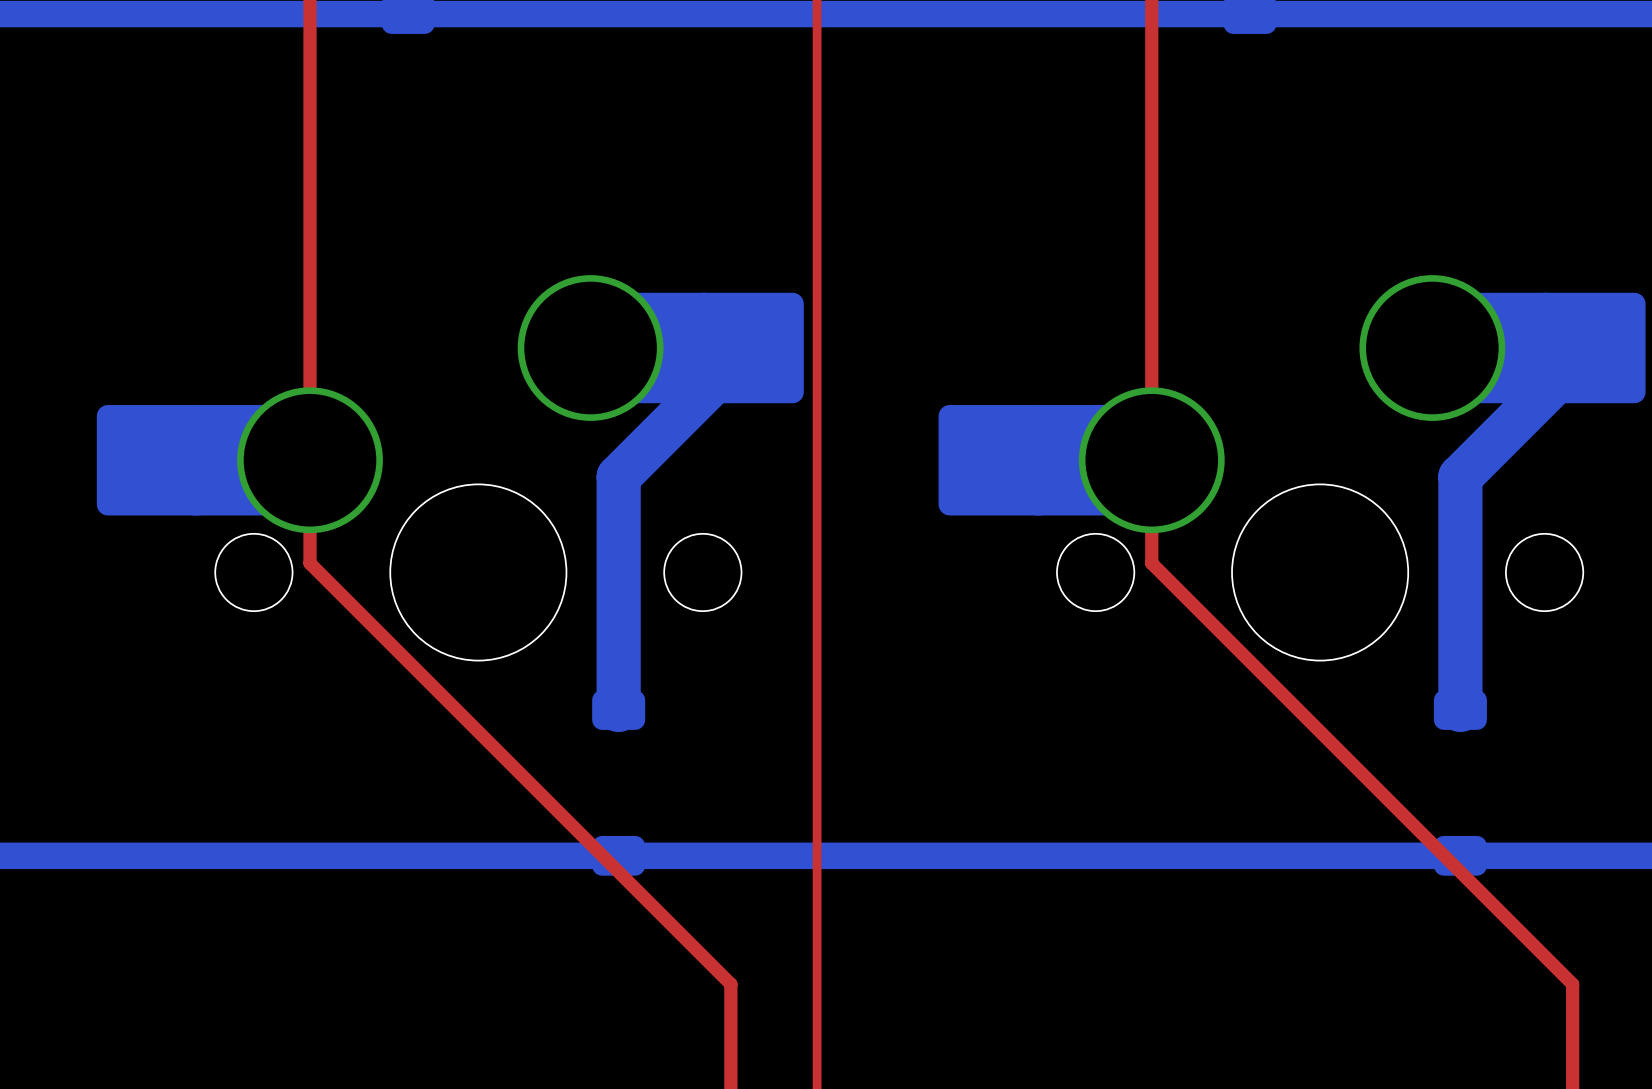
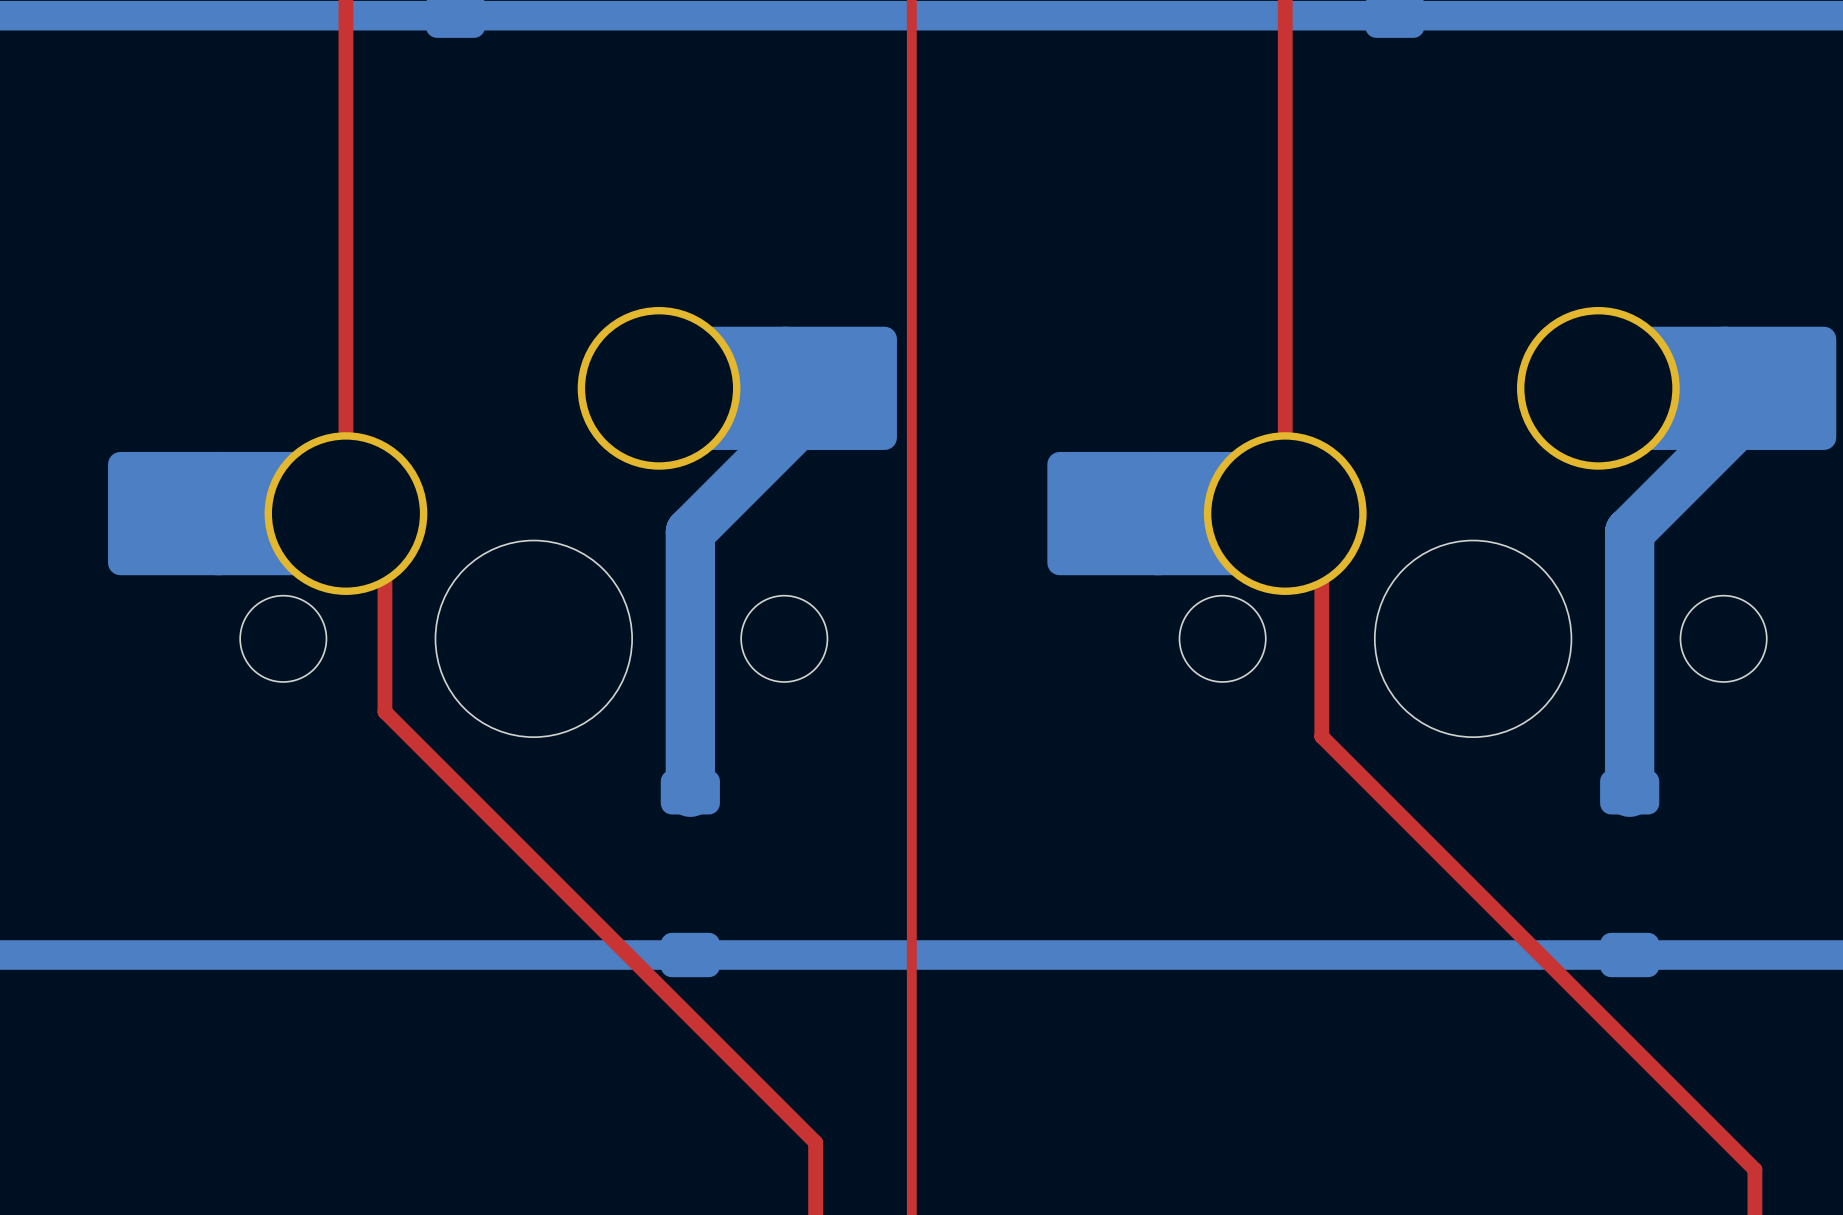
top track: (310, 460) (310, 563) (730, 984) (730, 1023) -> (345, 513) (384, 552) (384, 711) (815, 1142)
top track: (1151, 460) (1151, 563) (1572, 984) (1572, 1048) -> (1285, 513) (1321, 550) (1321, 736) (1754, 1169)

